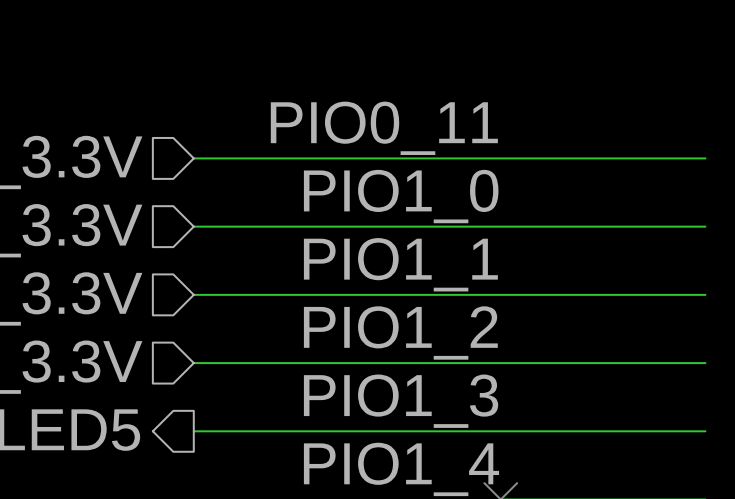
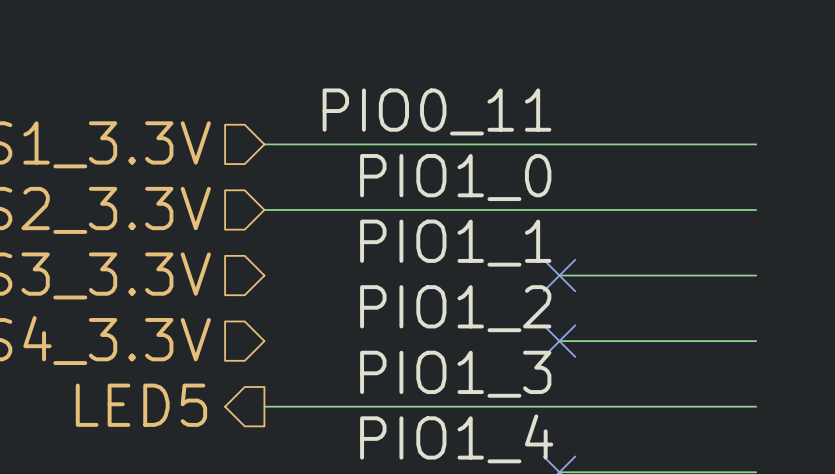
wire: (193, 294) (500, 294) -> none
no-connect mark: none -> (559, 275)
wire: (193, 363) (500, 363) -> none
no-connect mark: none -> (559, 341)

